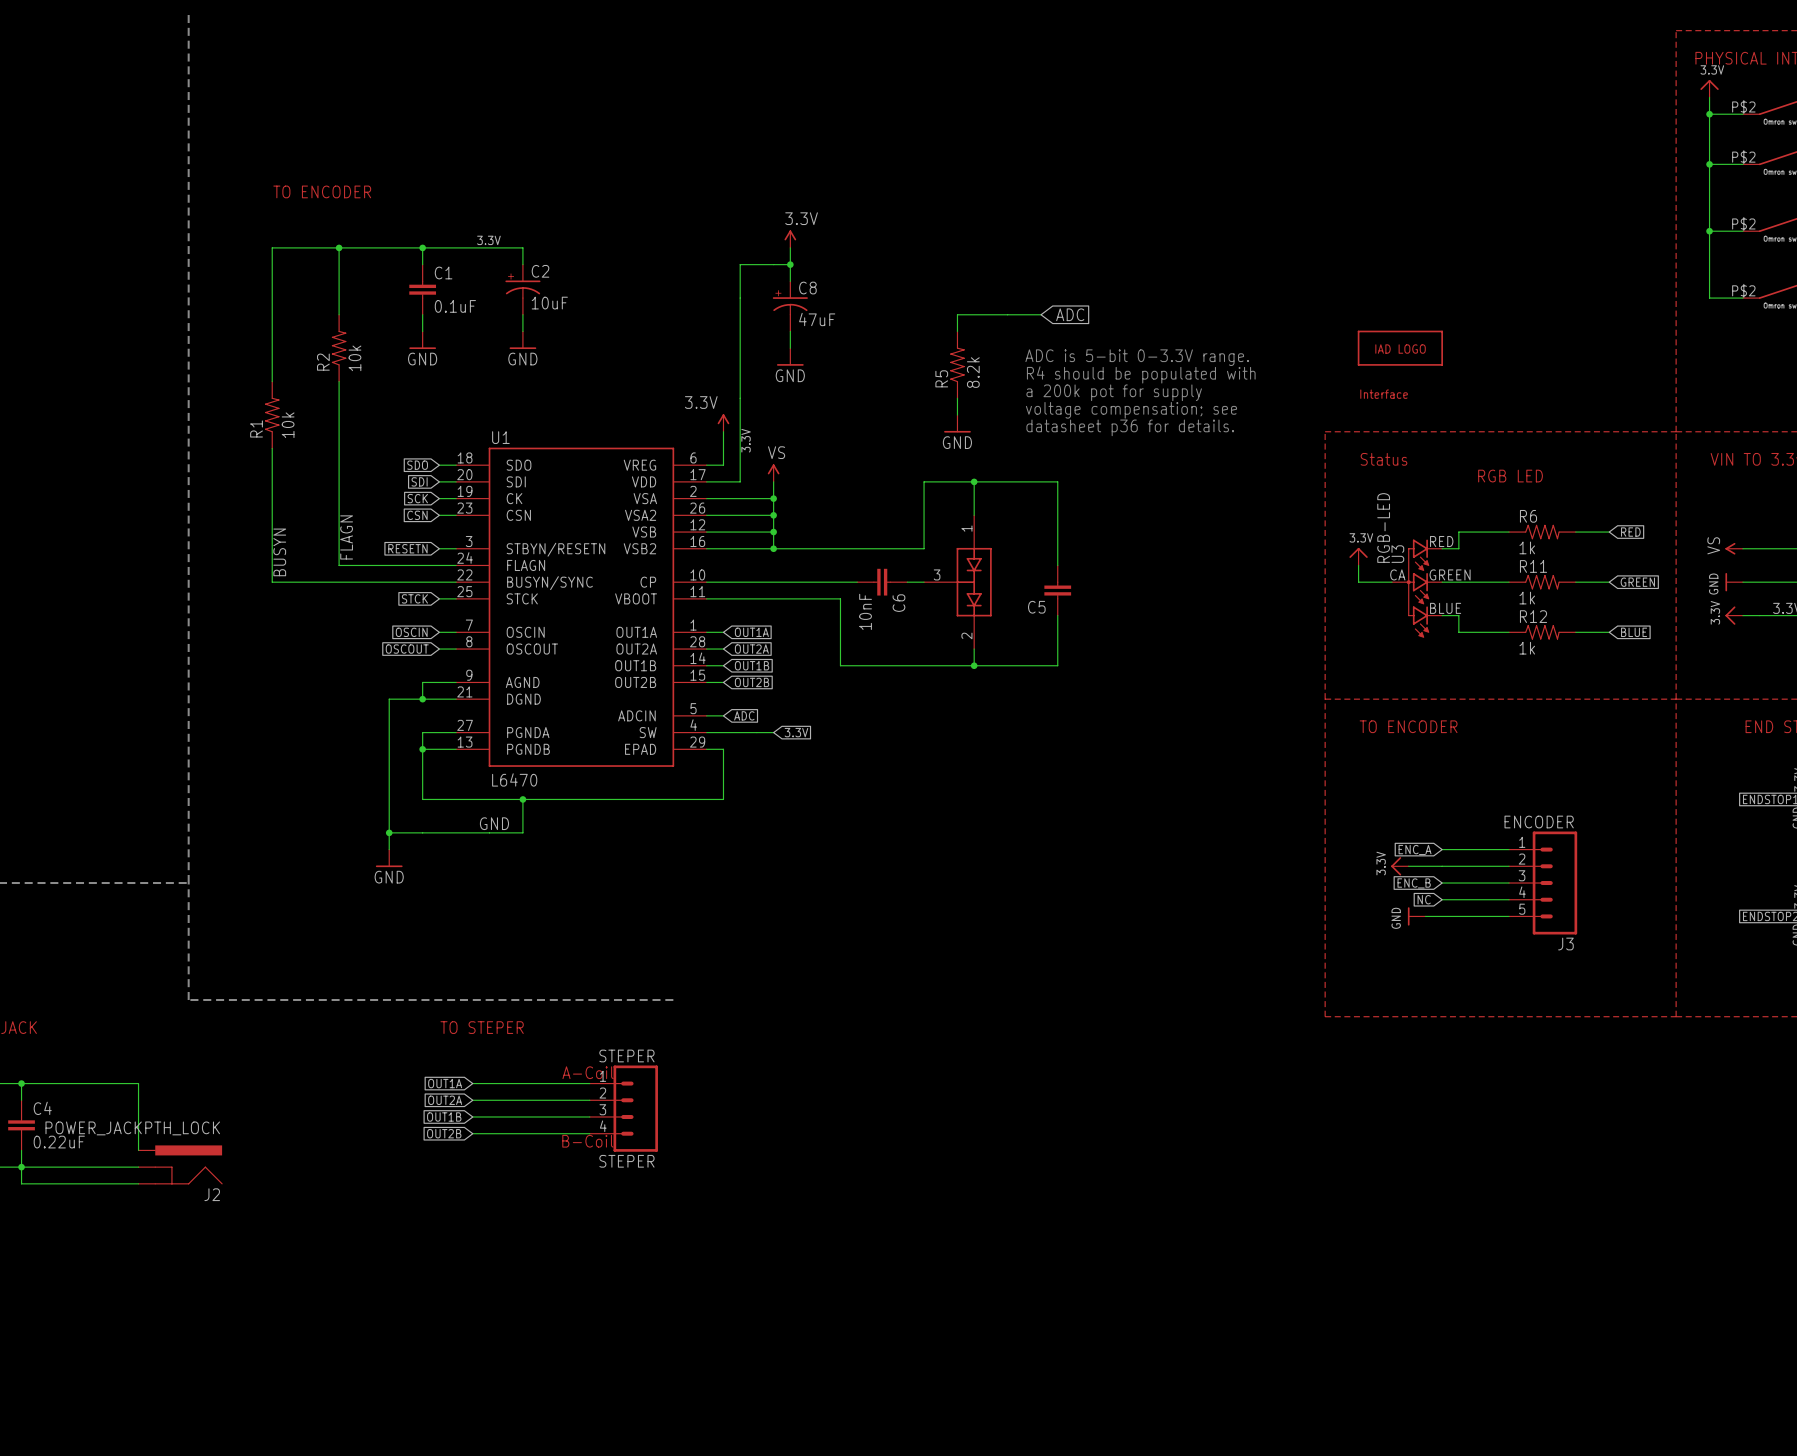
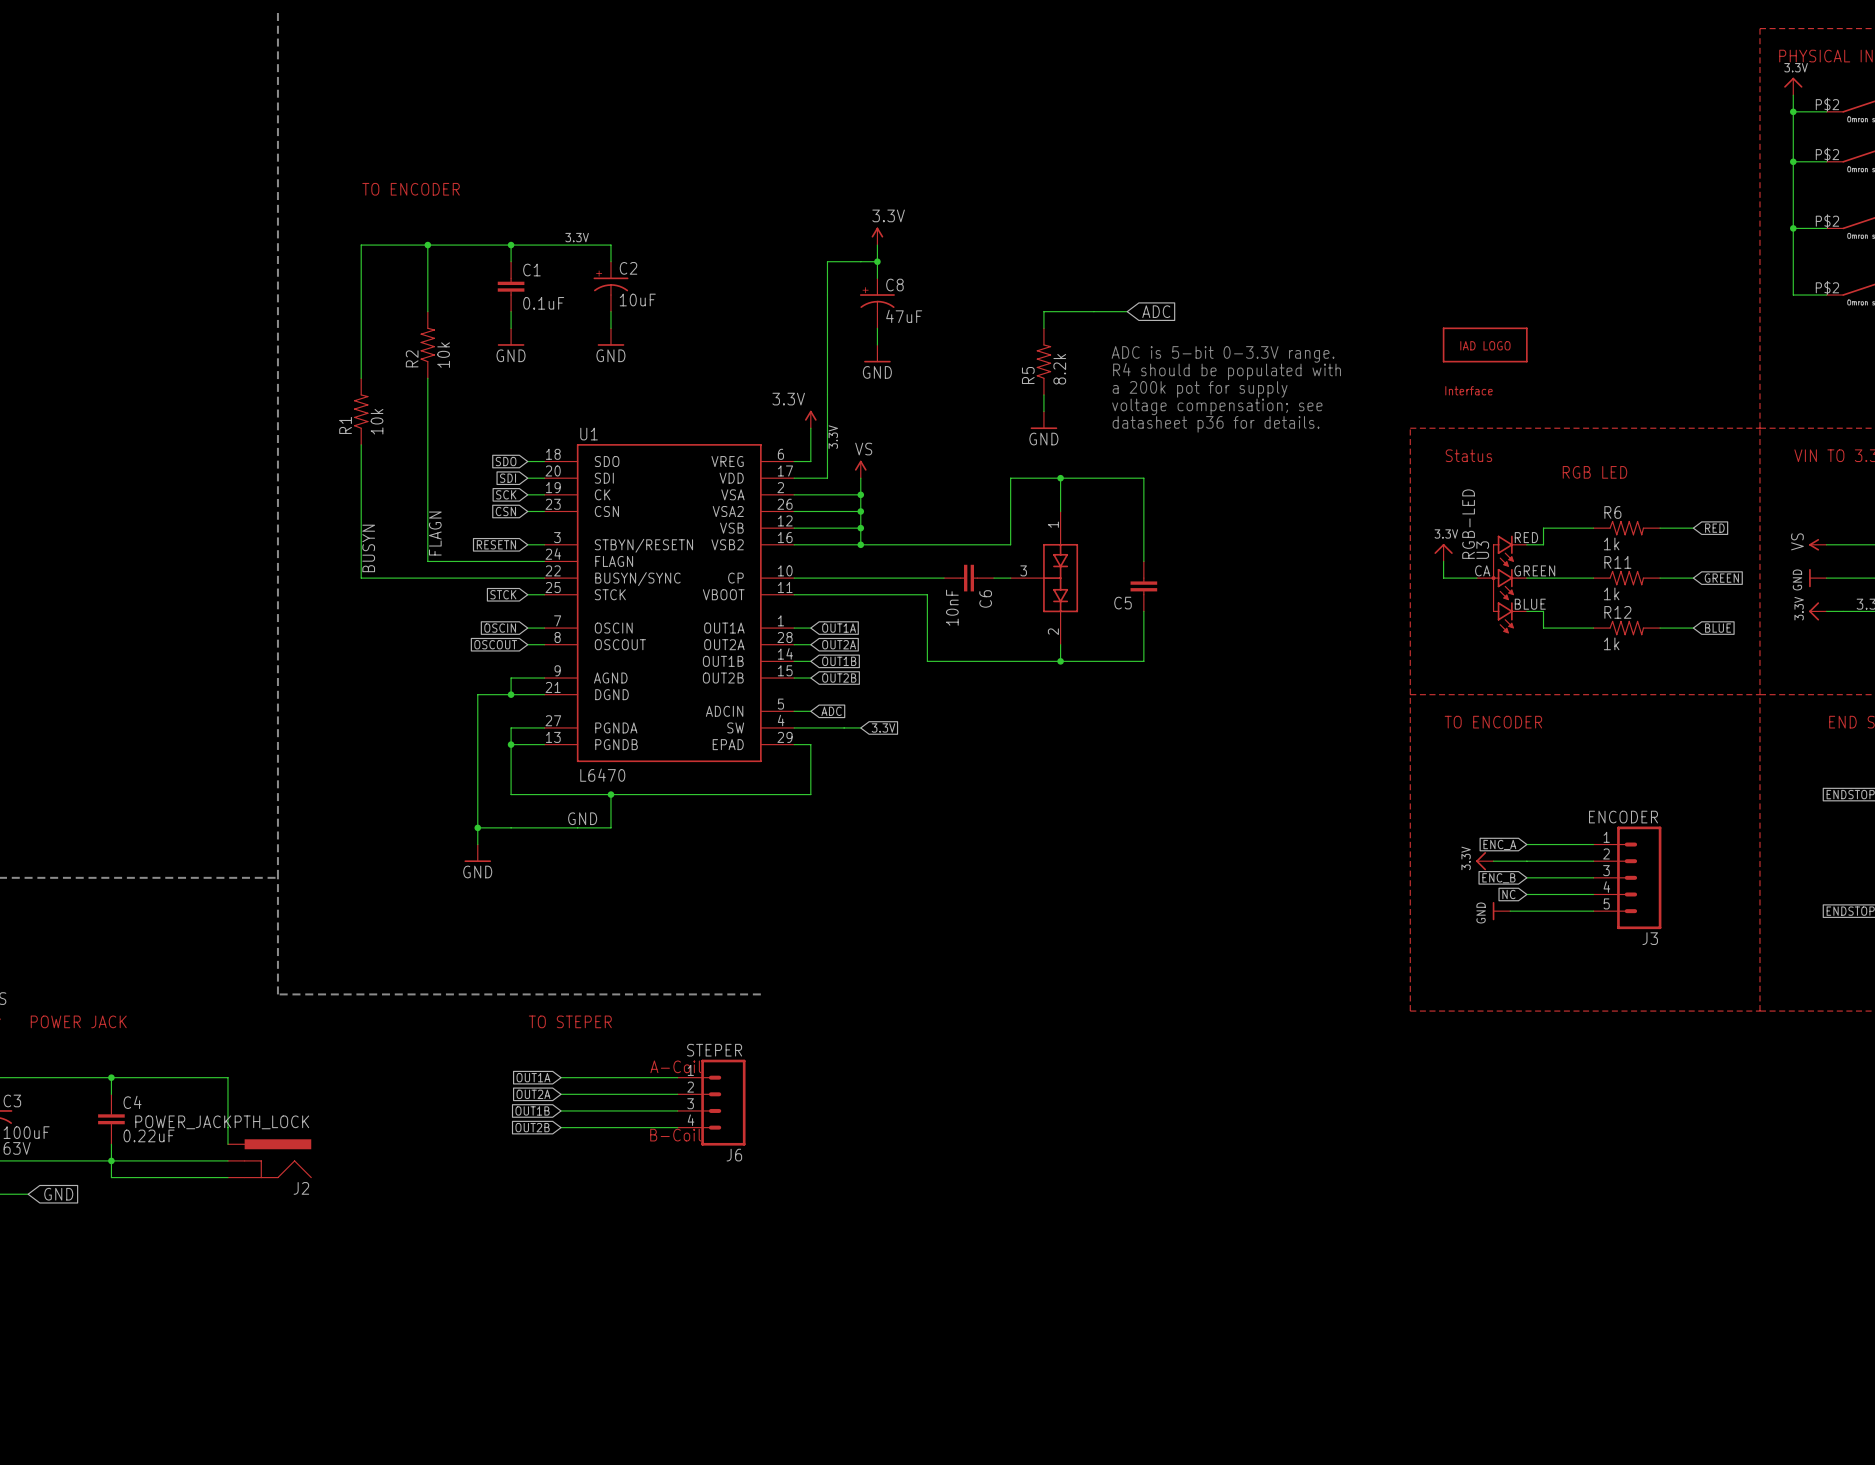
STEPER name: STEPER (626, 1161) -> J6 (734, 1155)

